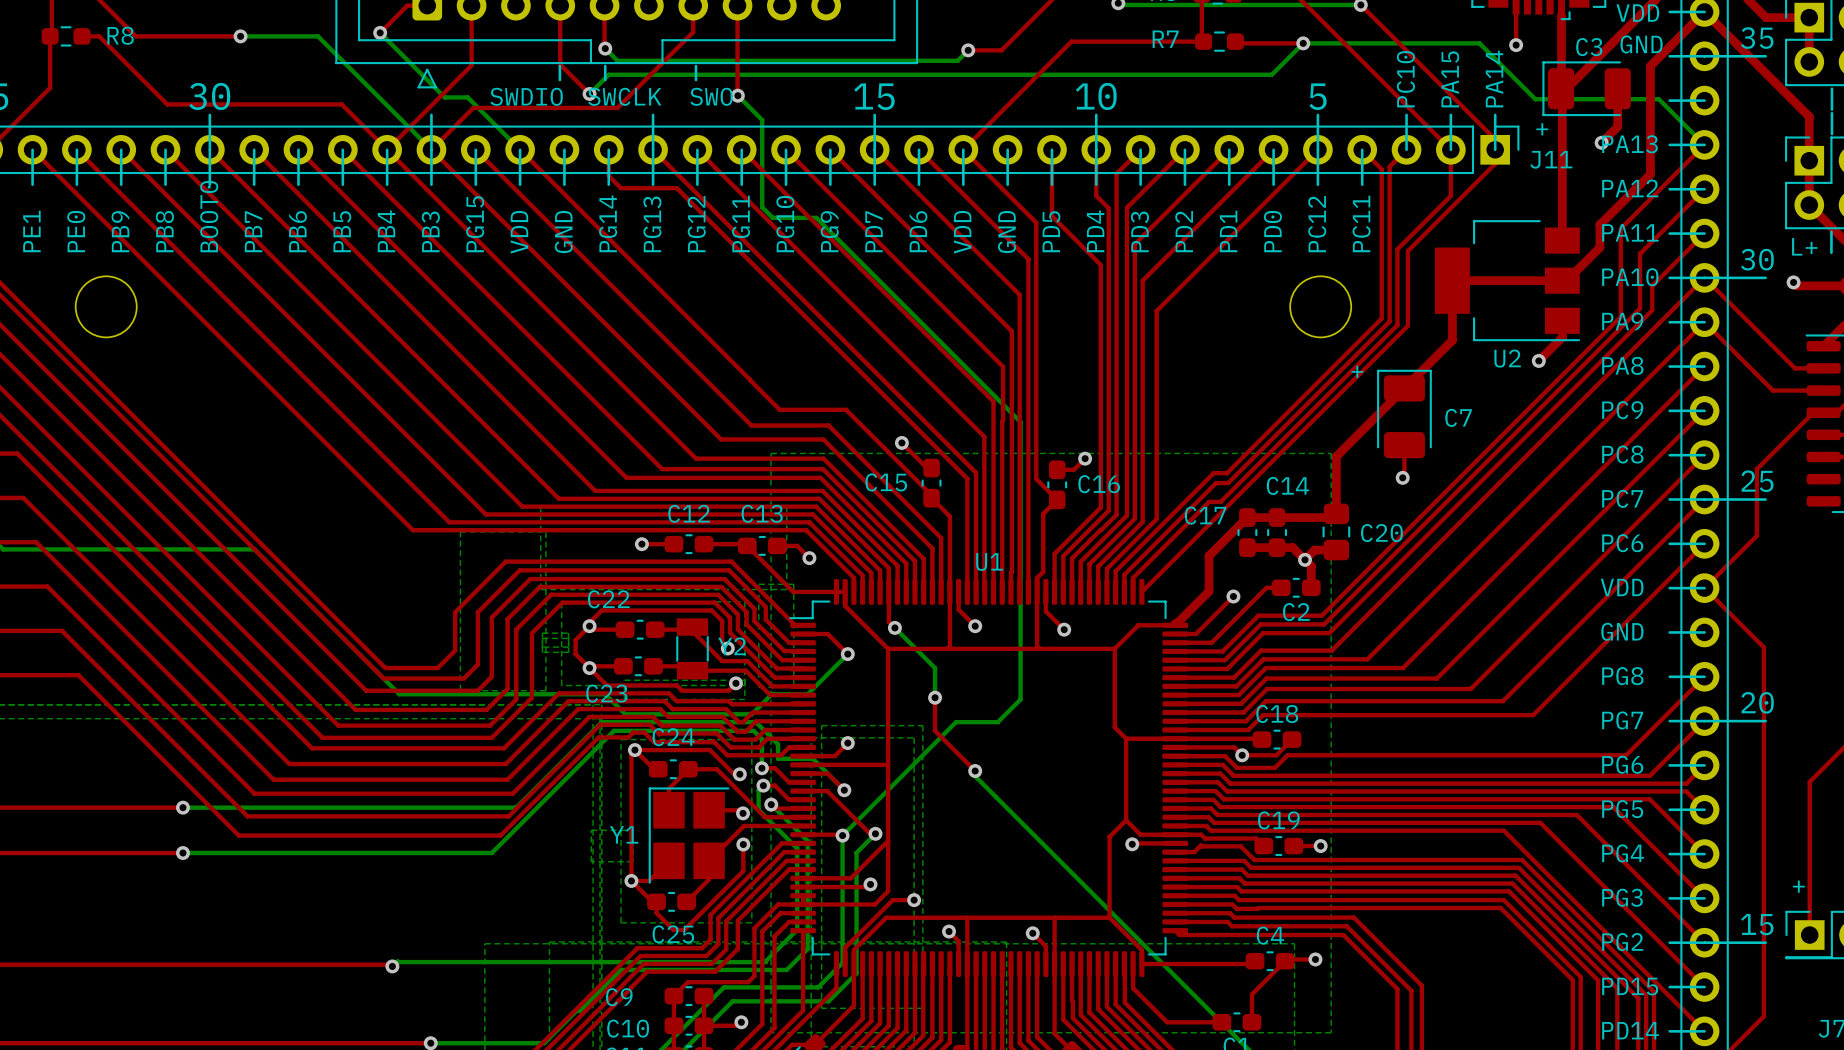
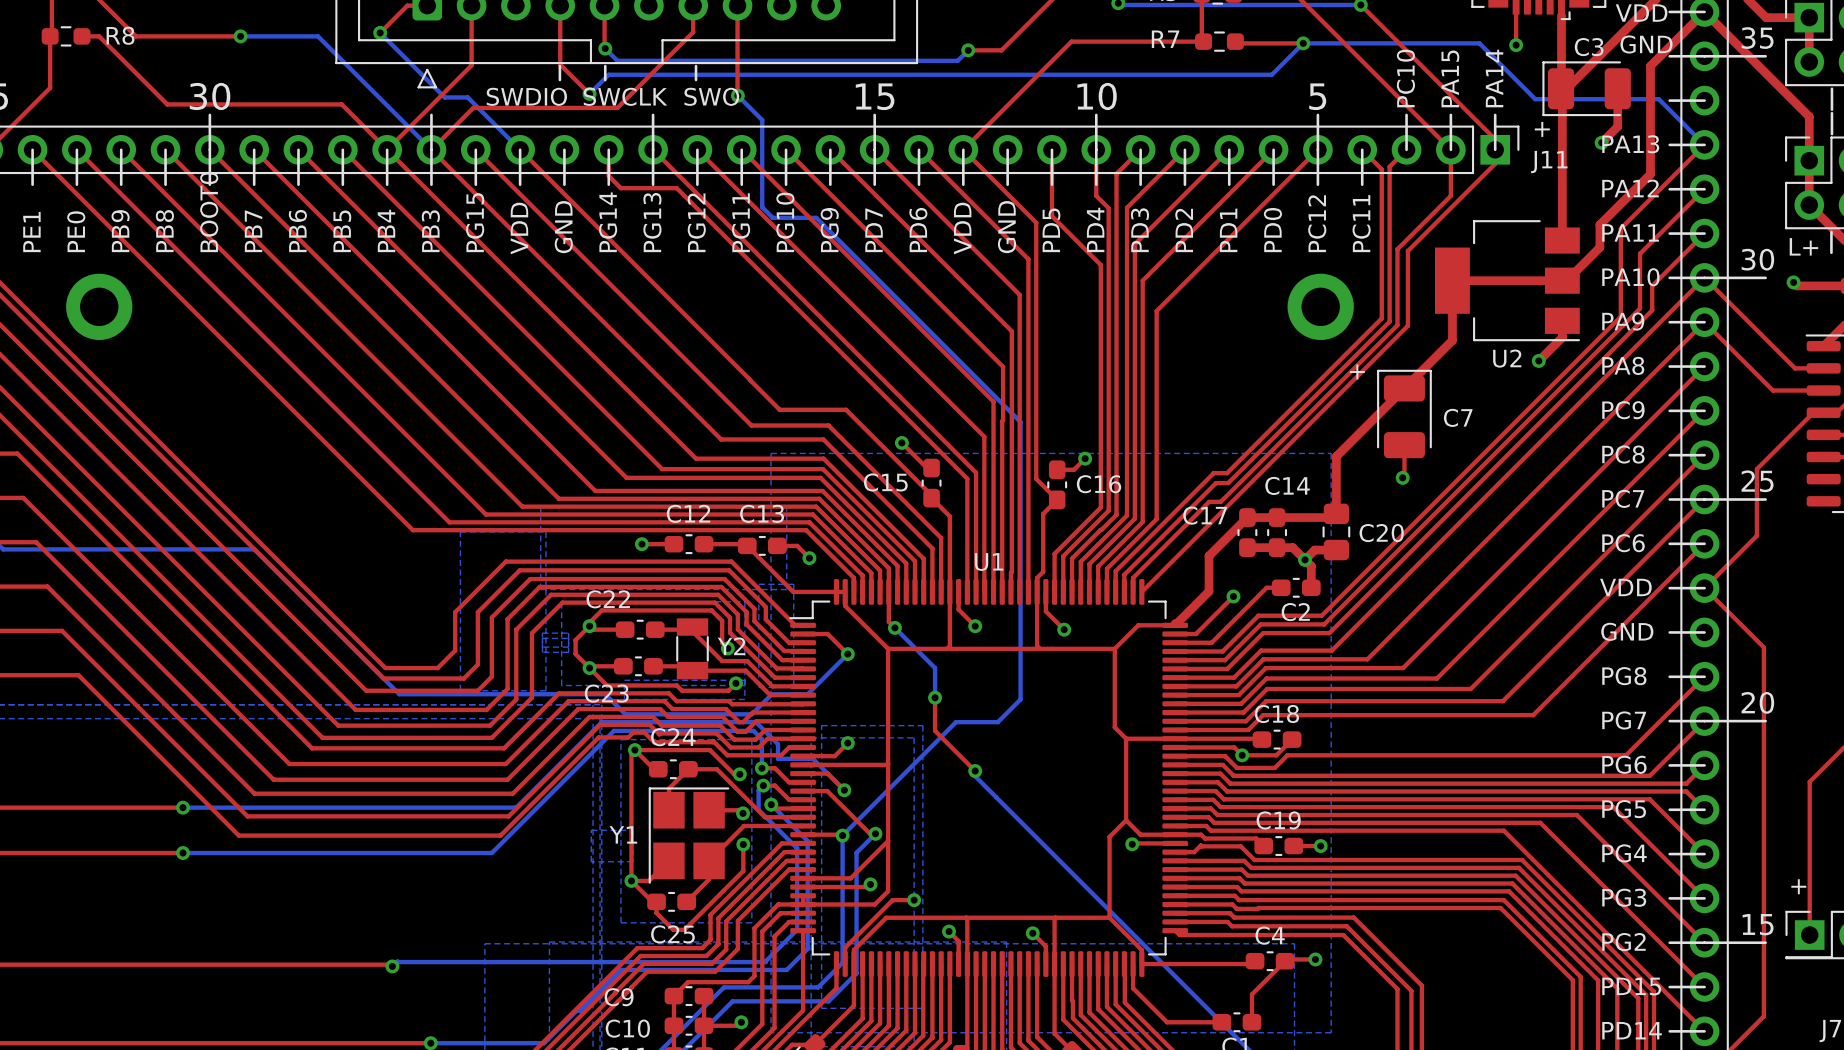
round board edge: [74, 275, 138, 339] -> none
round board edge: [1289, 275, 1353, 339] -> none
part: none -> (99, 306)
part: none -> (1320, 306)

